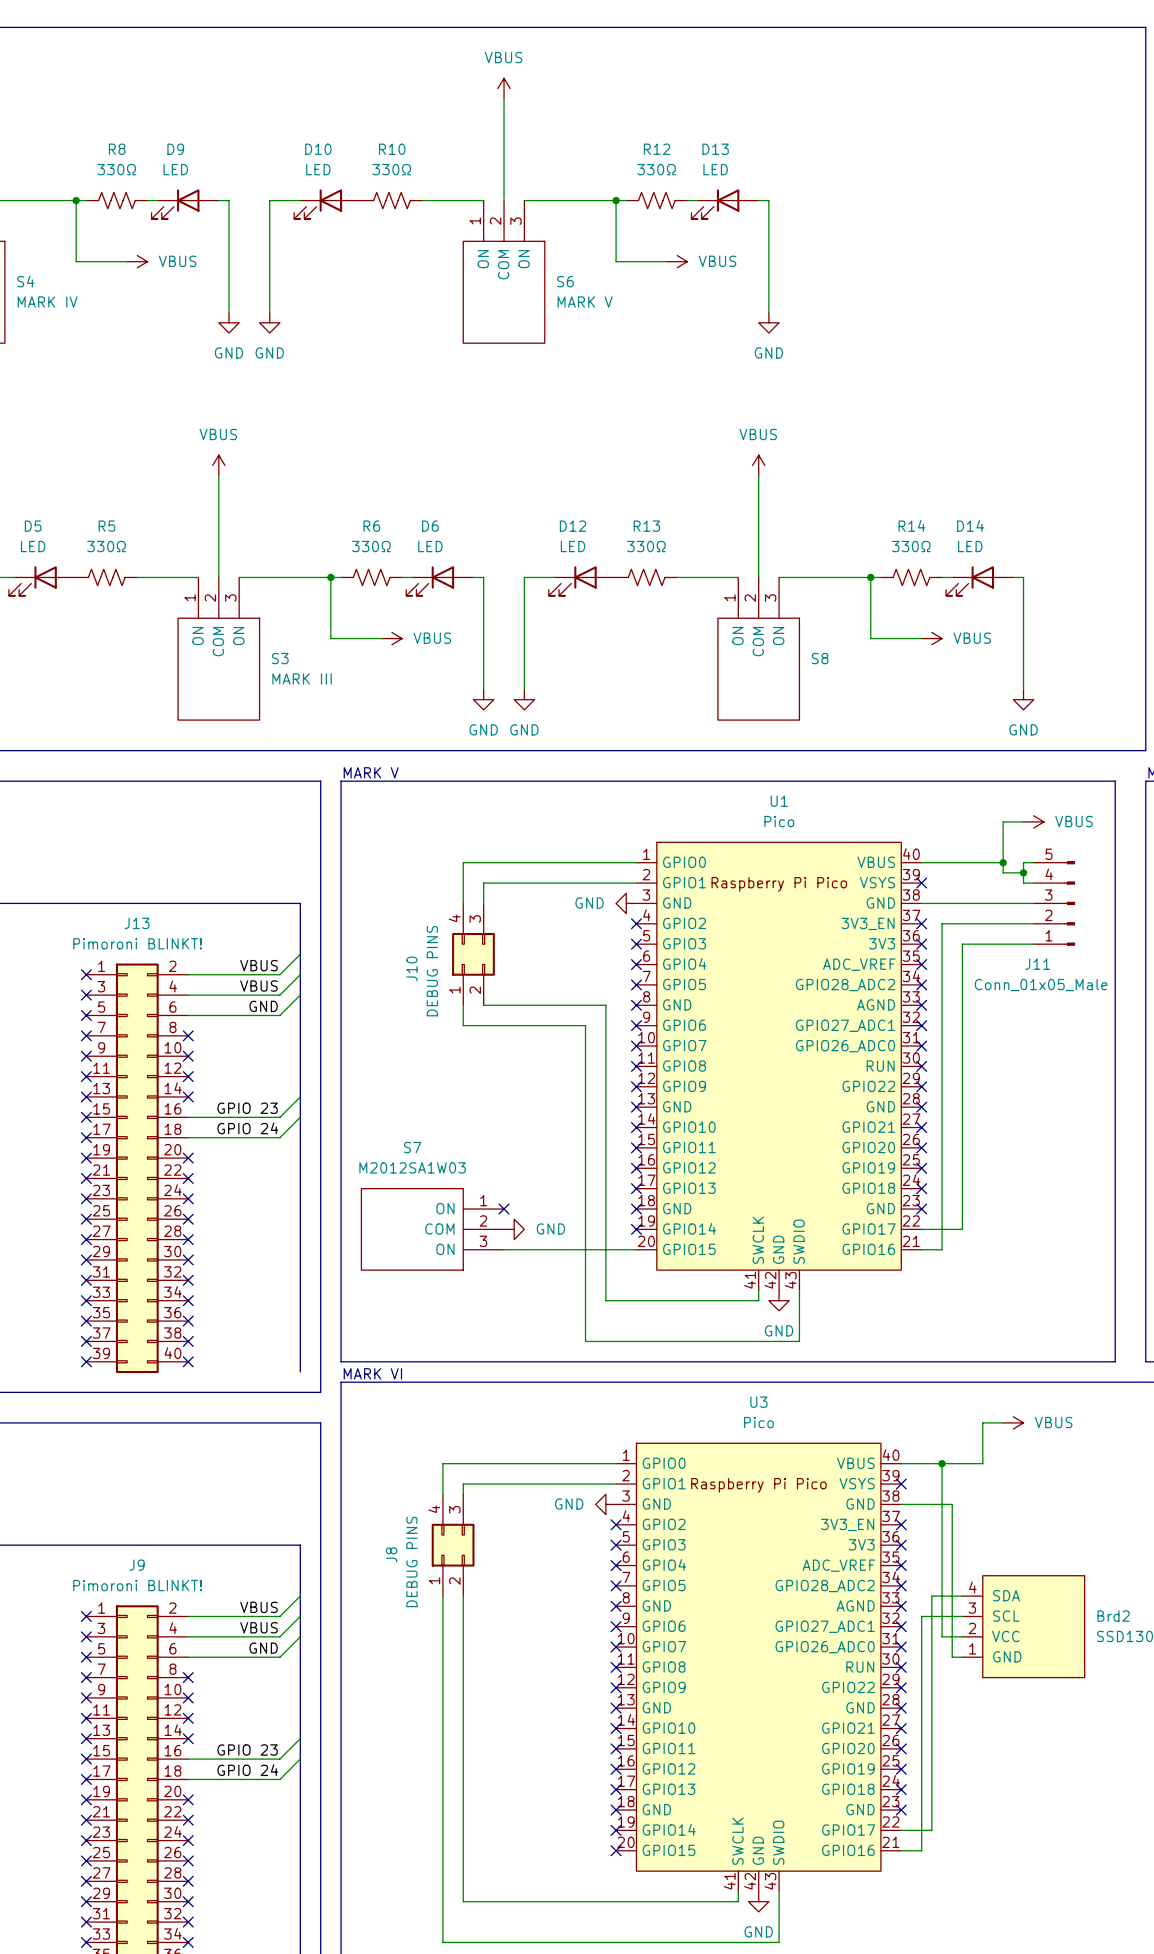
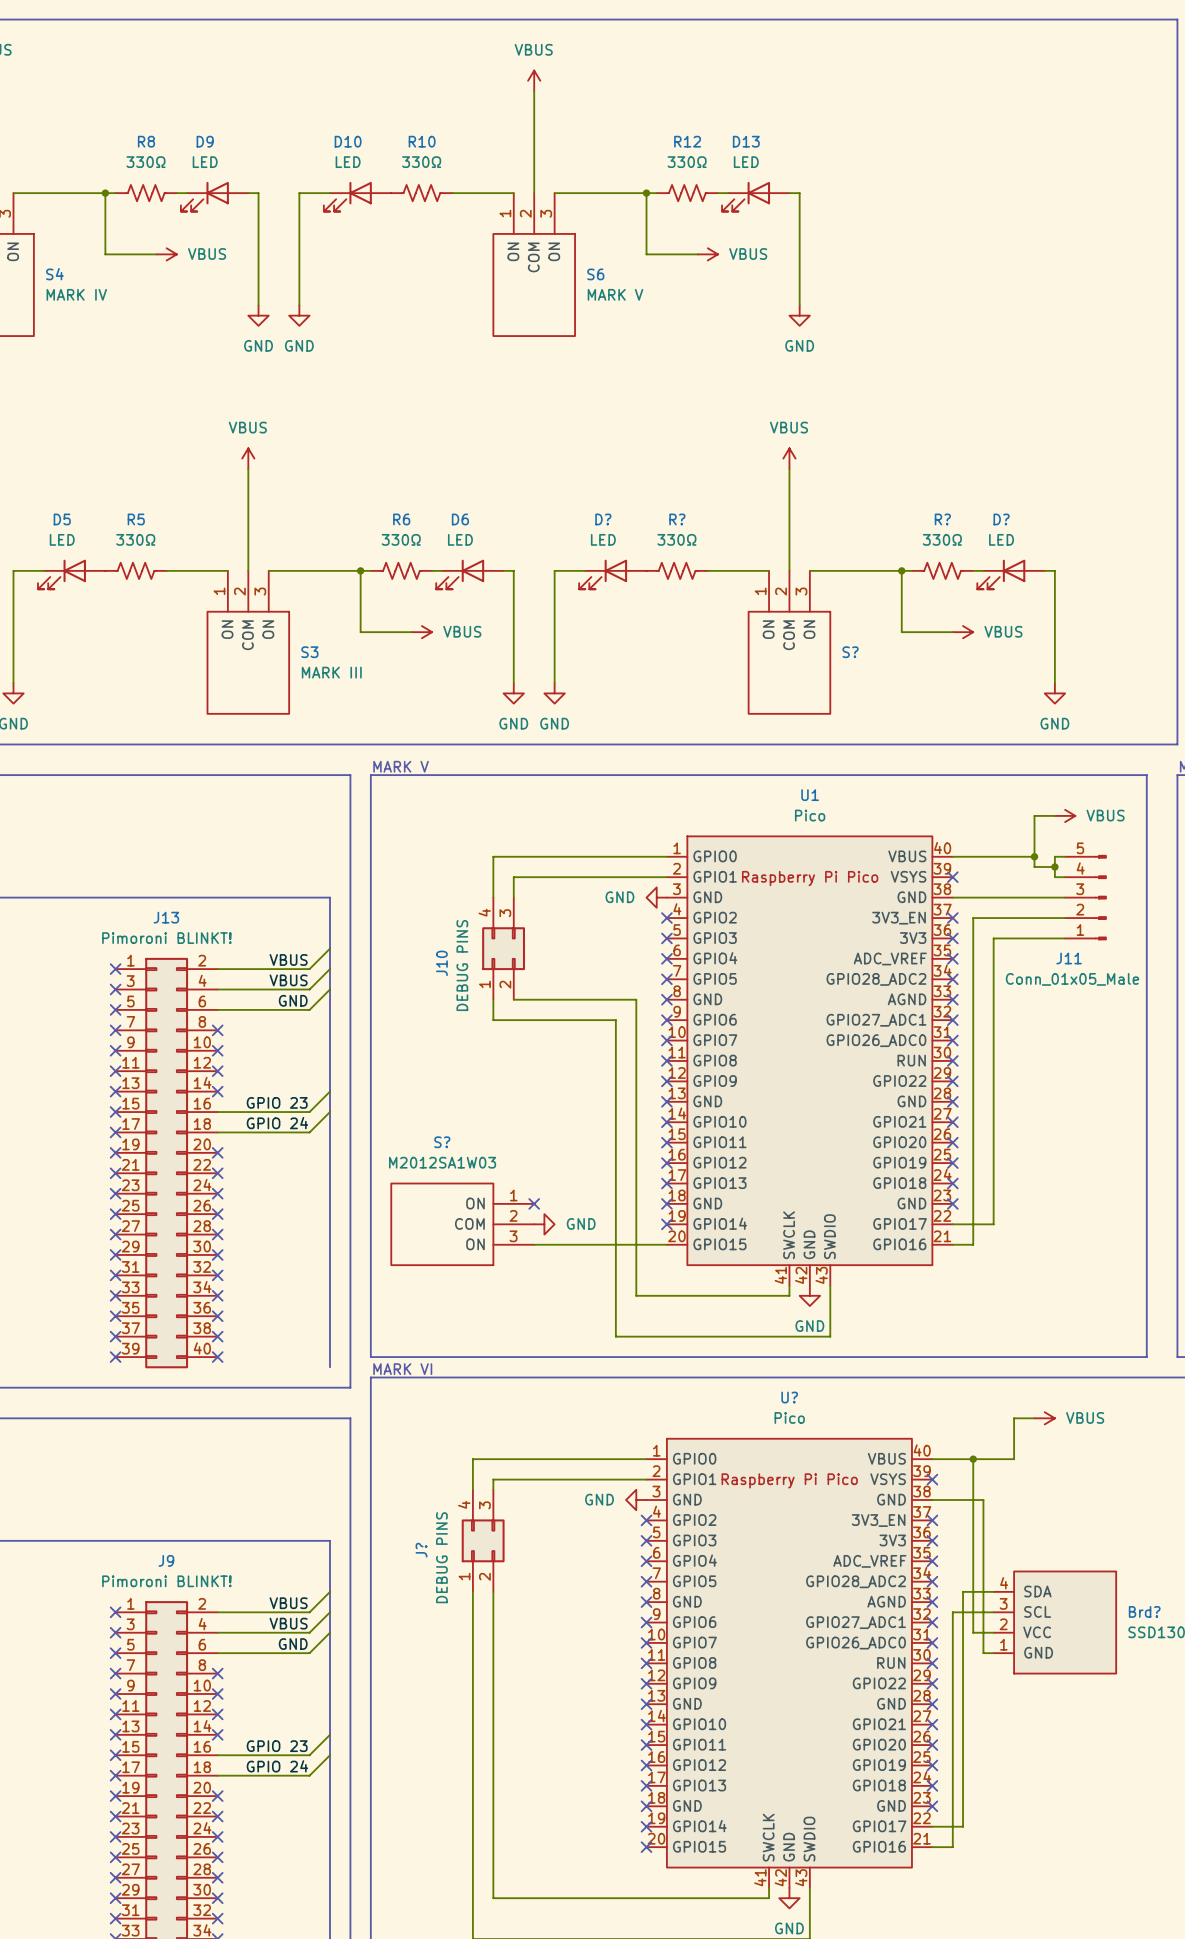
R14 name: R14 (911, 525) -> R? (942, 519)
D14 name: D14 (970, 525) -> D? (1001, 519)
D12 name: D12 (573, 526) -> D? (603, 519)
R13 name: R13 (646, 526) -> R? (677, 519)
S8 name: S8 (820, 658) -> S? (850, 652)
S7 name: S7 (412, 1147) -> S? (442, 1142)
U3 name: U3 (758, 1402) -> U? (789, 1397)
J8 name: J8 (391, 1554) -> J? (421, 1550)
Brd2 name: Brd2 (1113, 1616) -> Brd? (1144, 1611)

